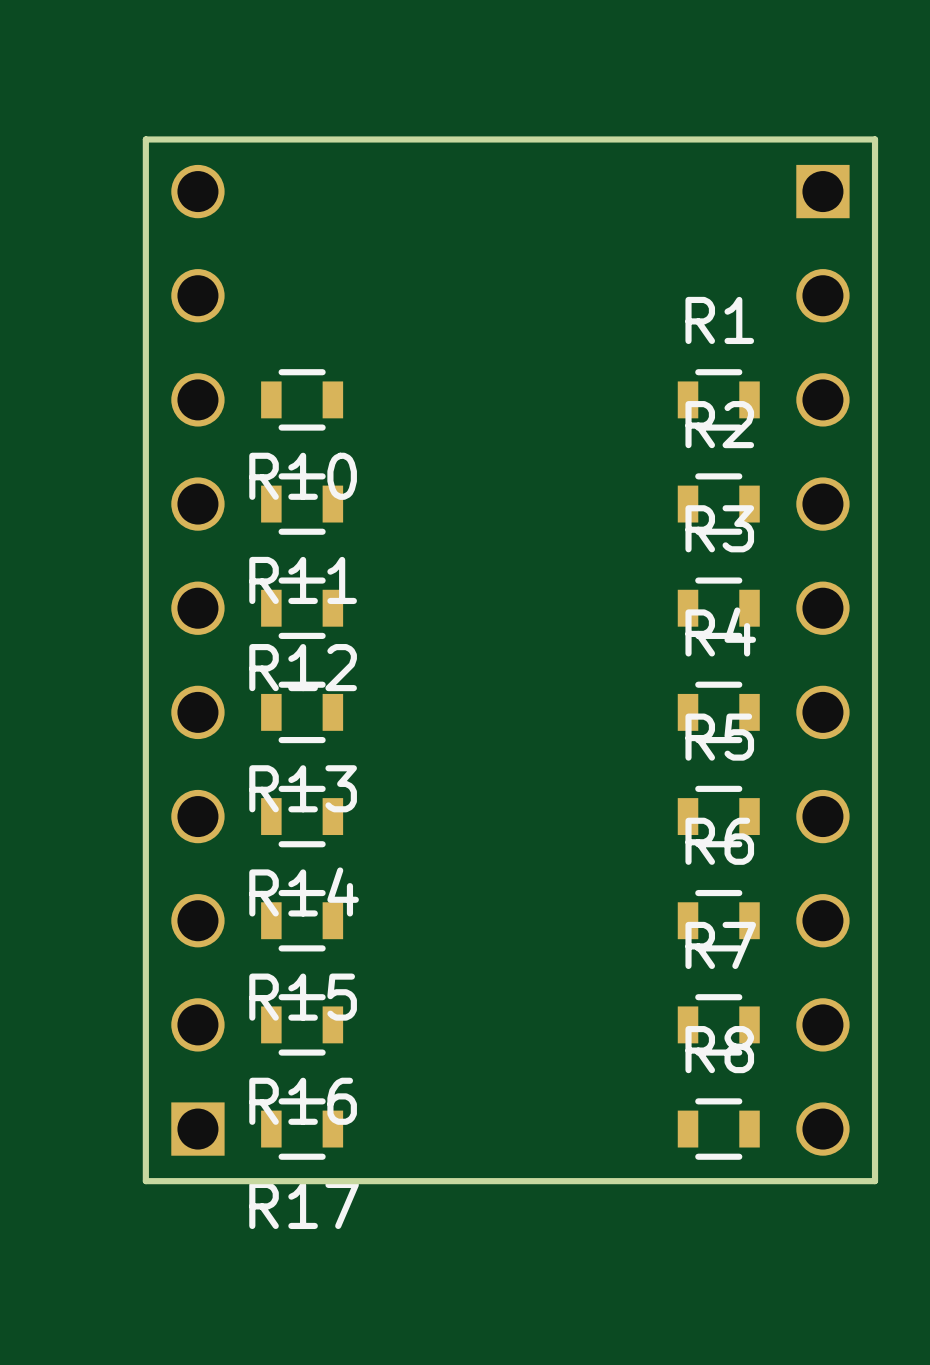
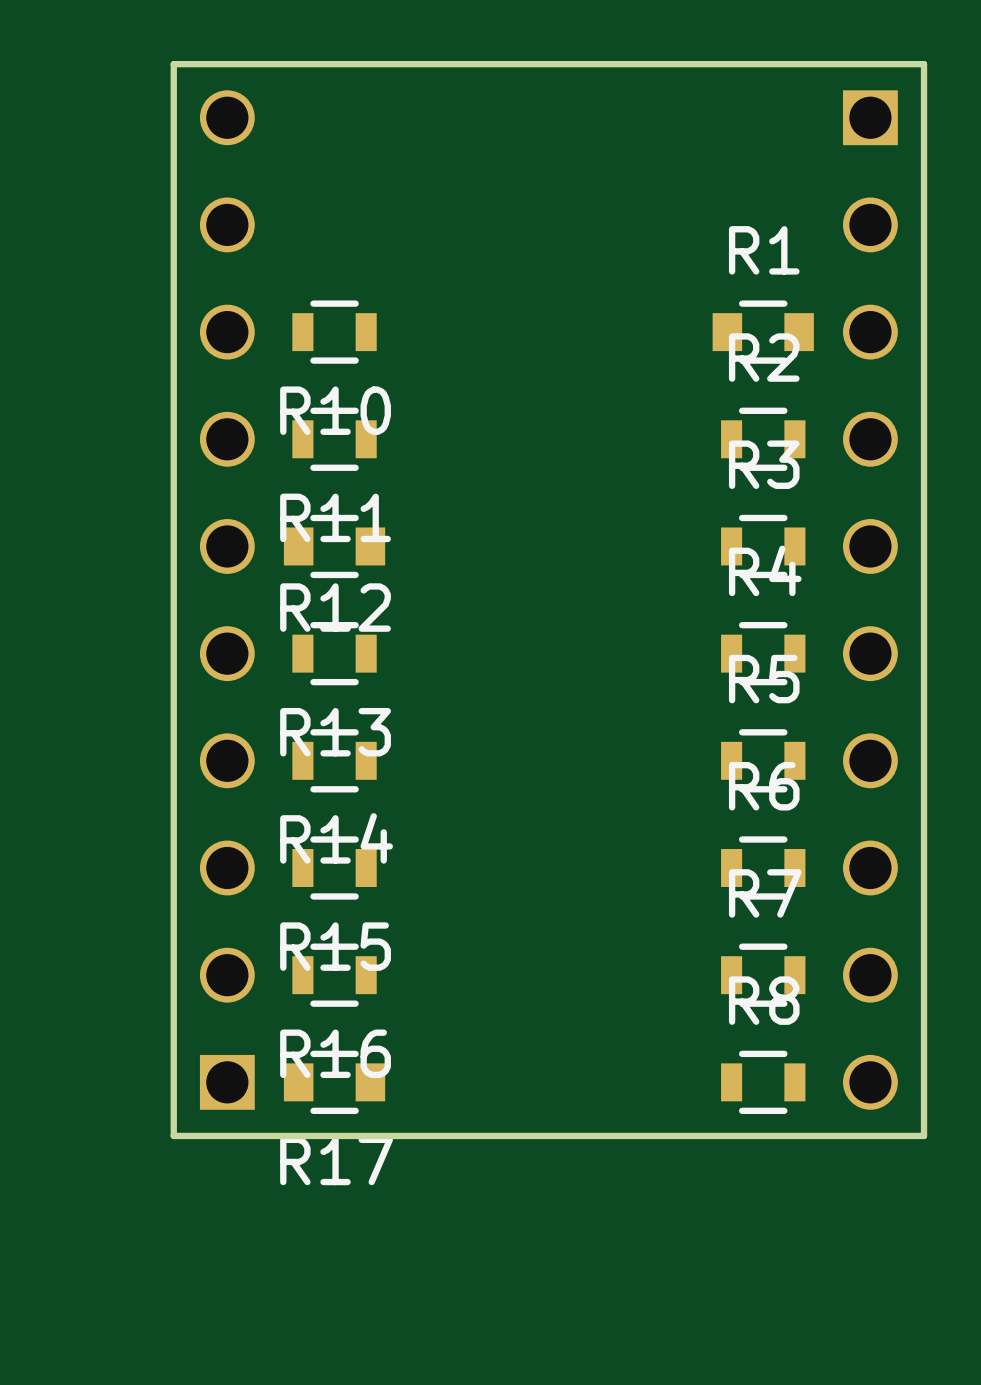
R1 footprint: [677, 369, 760, 431] -> [712, 300, 814, 364]
R12 footprint: [261, 577, 344, 639] -> [283, 514, 386, 579]
R17 footprint: [261, 1098, 344, 1160] -> [283, 1050, 386, 1115]

